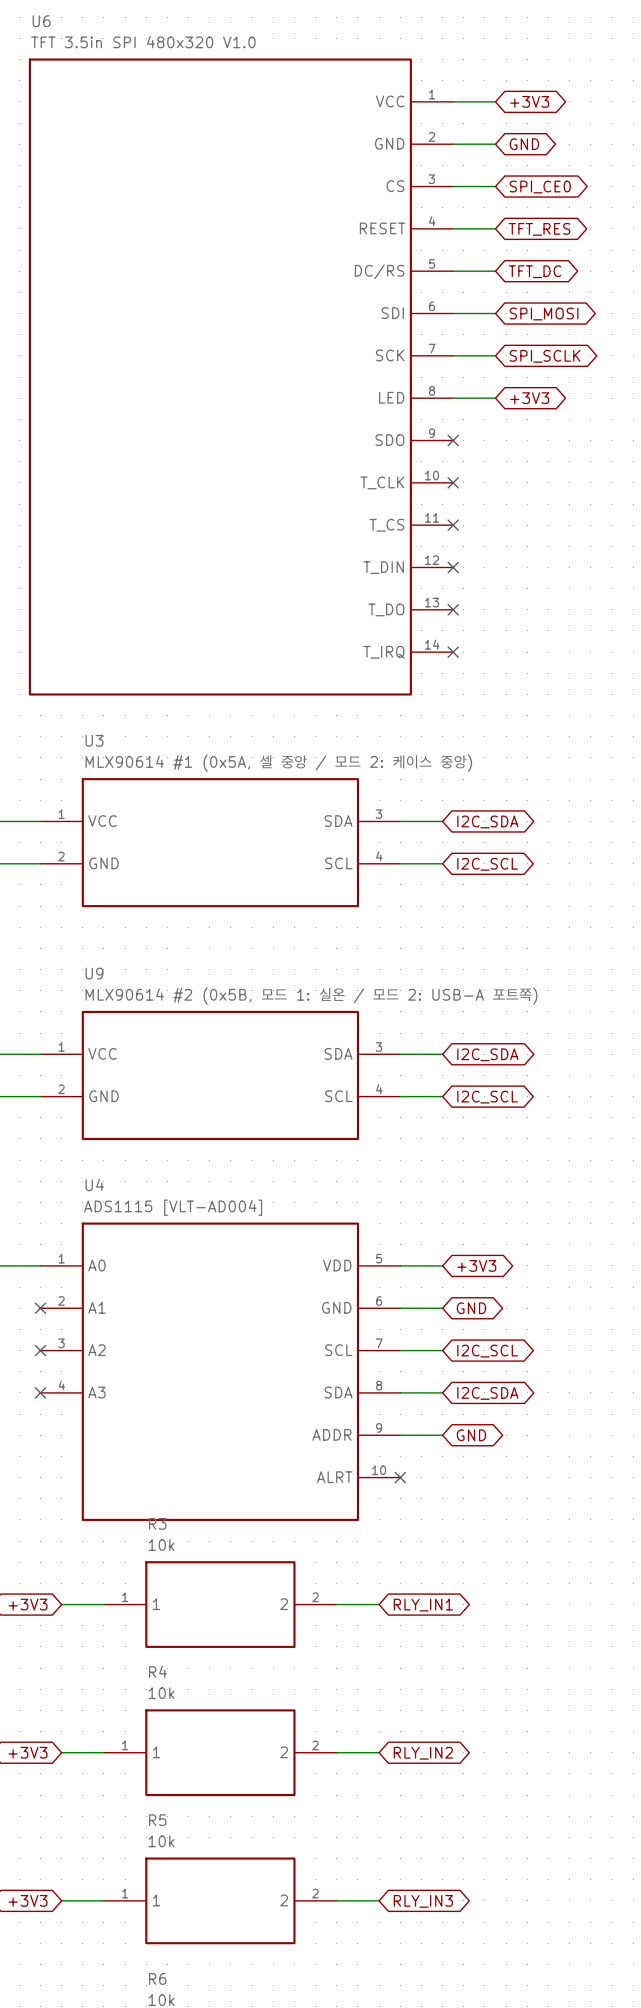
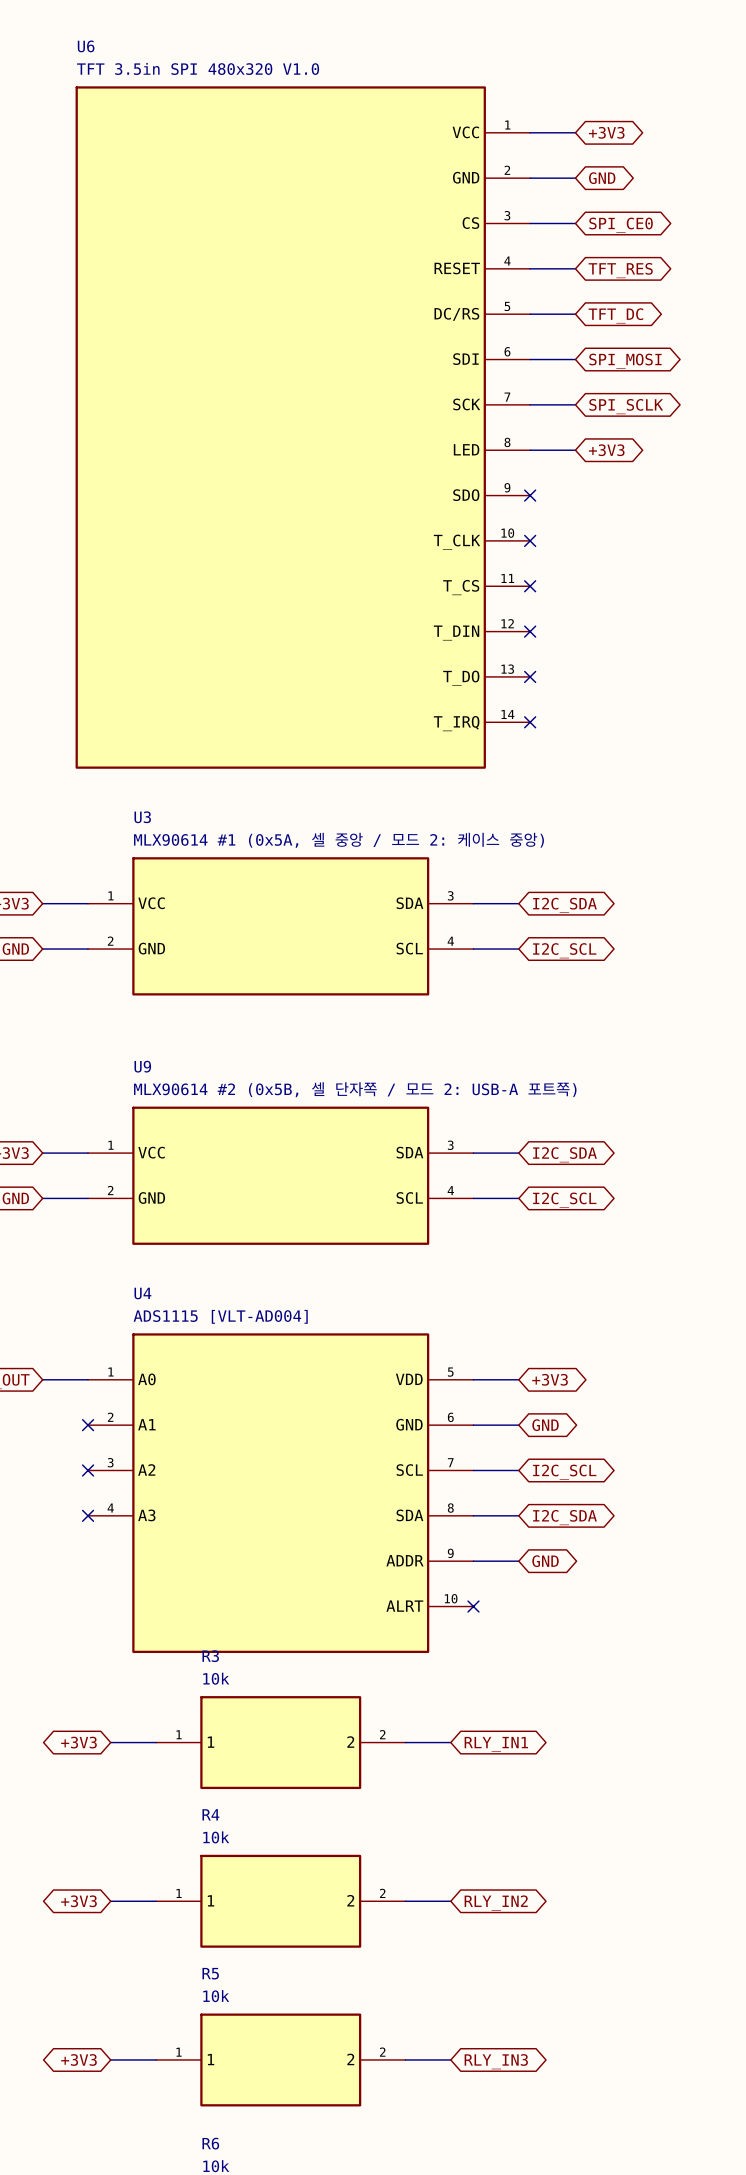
U9 value: MLX90614 #2 (0x5B, 모드 1: 실온 / 모드 2: USB-A 포트쪽) (311, 996) -> MLX90614 #2 (0x5B, 셀 단자쪽 / 모드 2: USB-A 포트쪽) (355, 1089)

